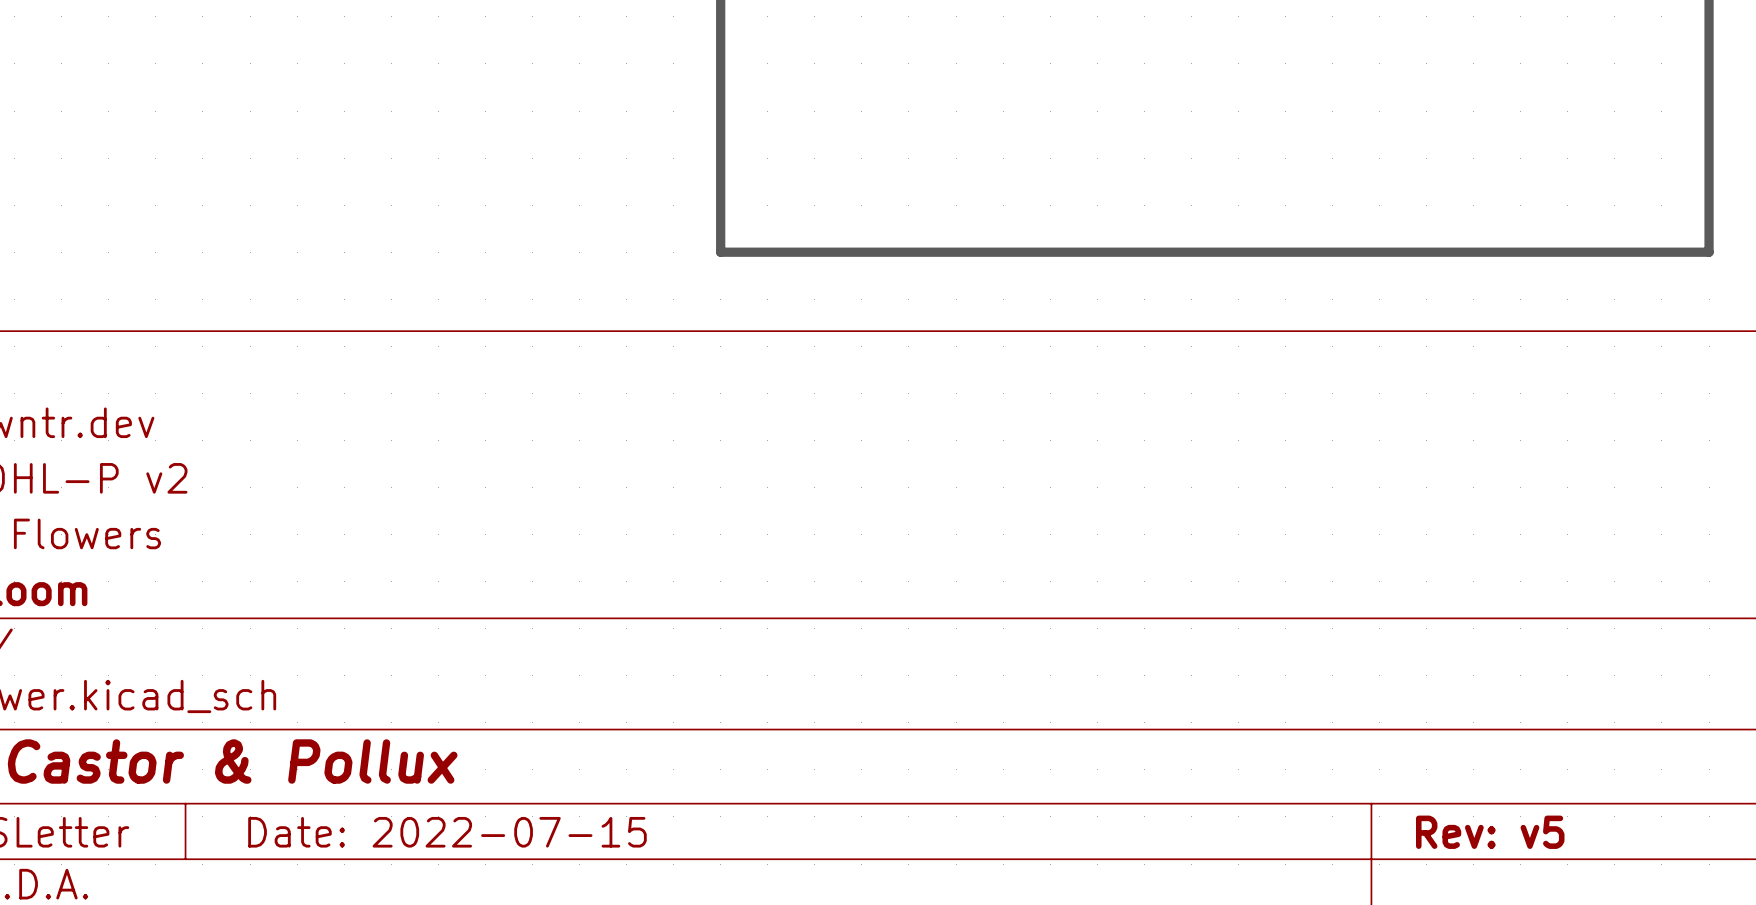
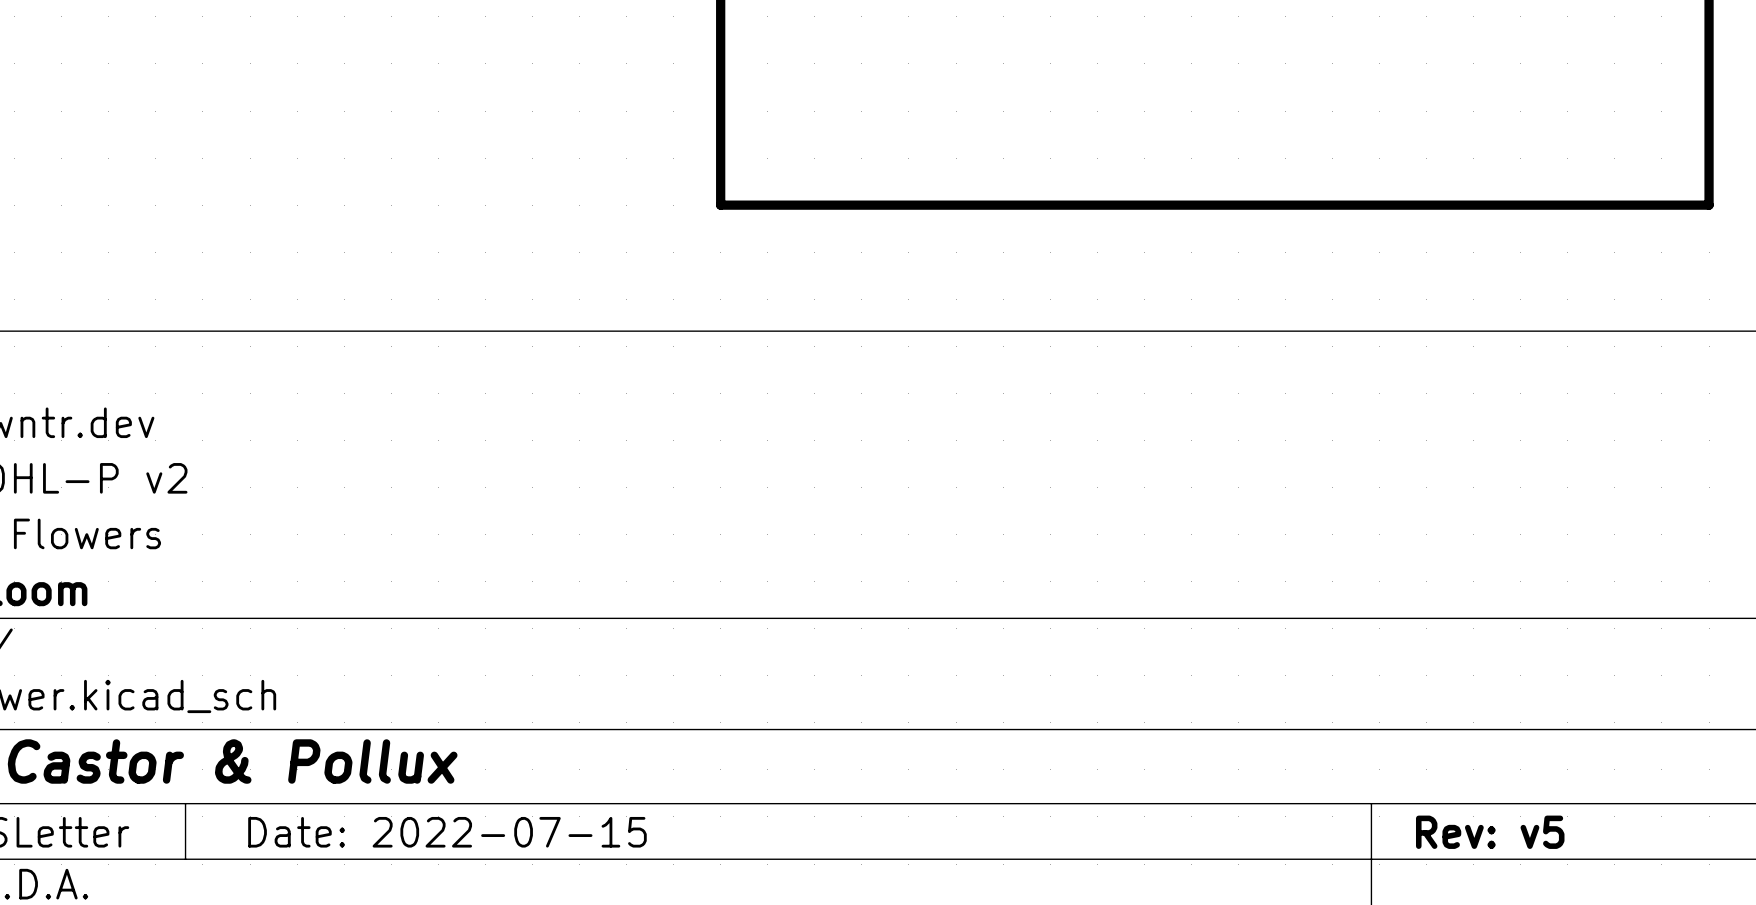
line: (720, 205) (720, 252) (1709, 252) (1709, 205) -> (720, 205) (1709, 205)

